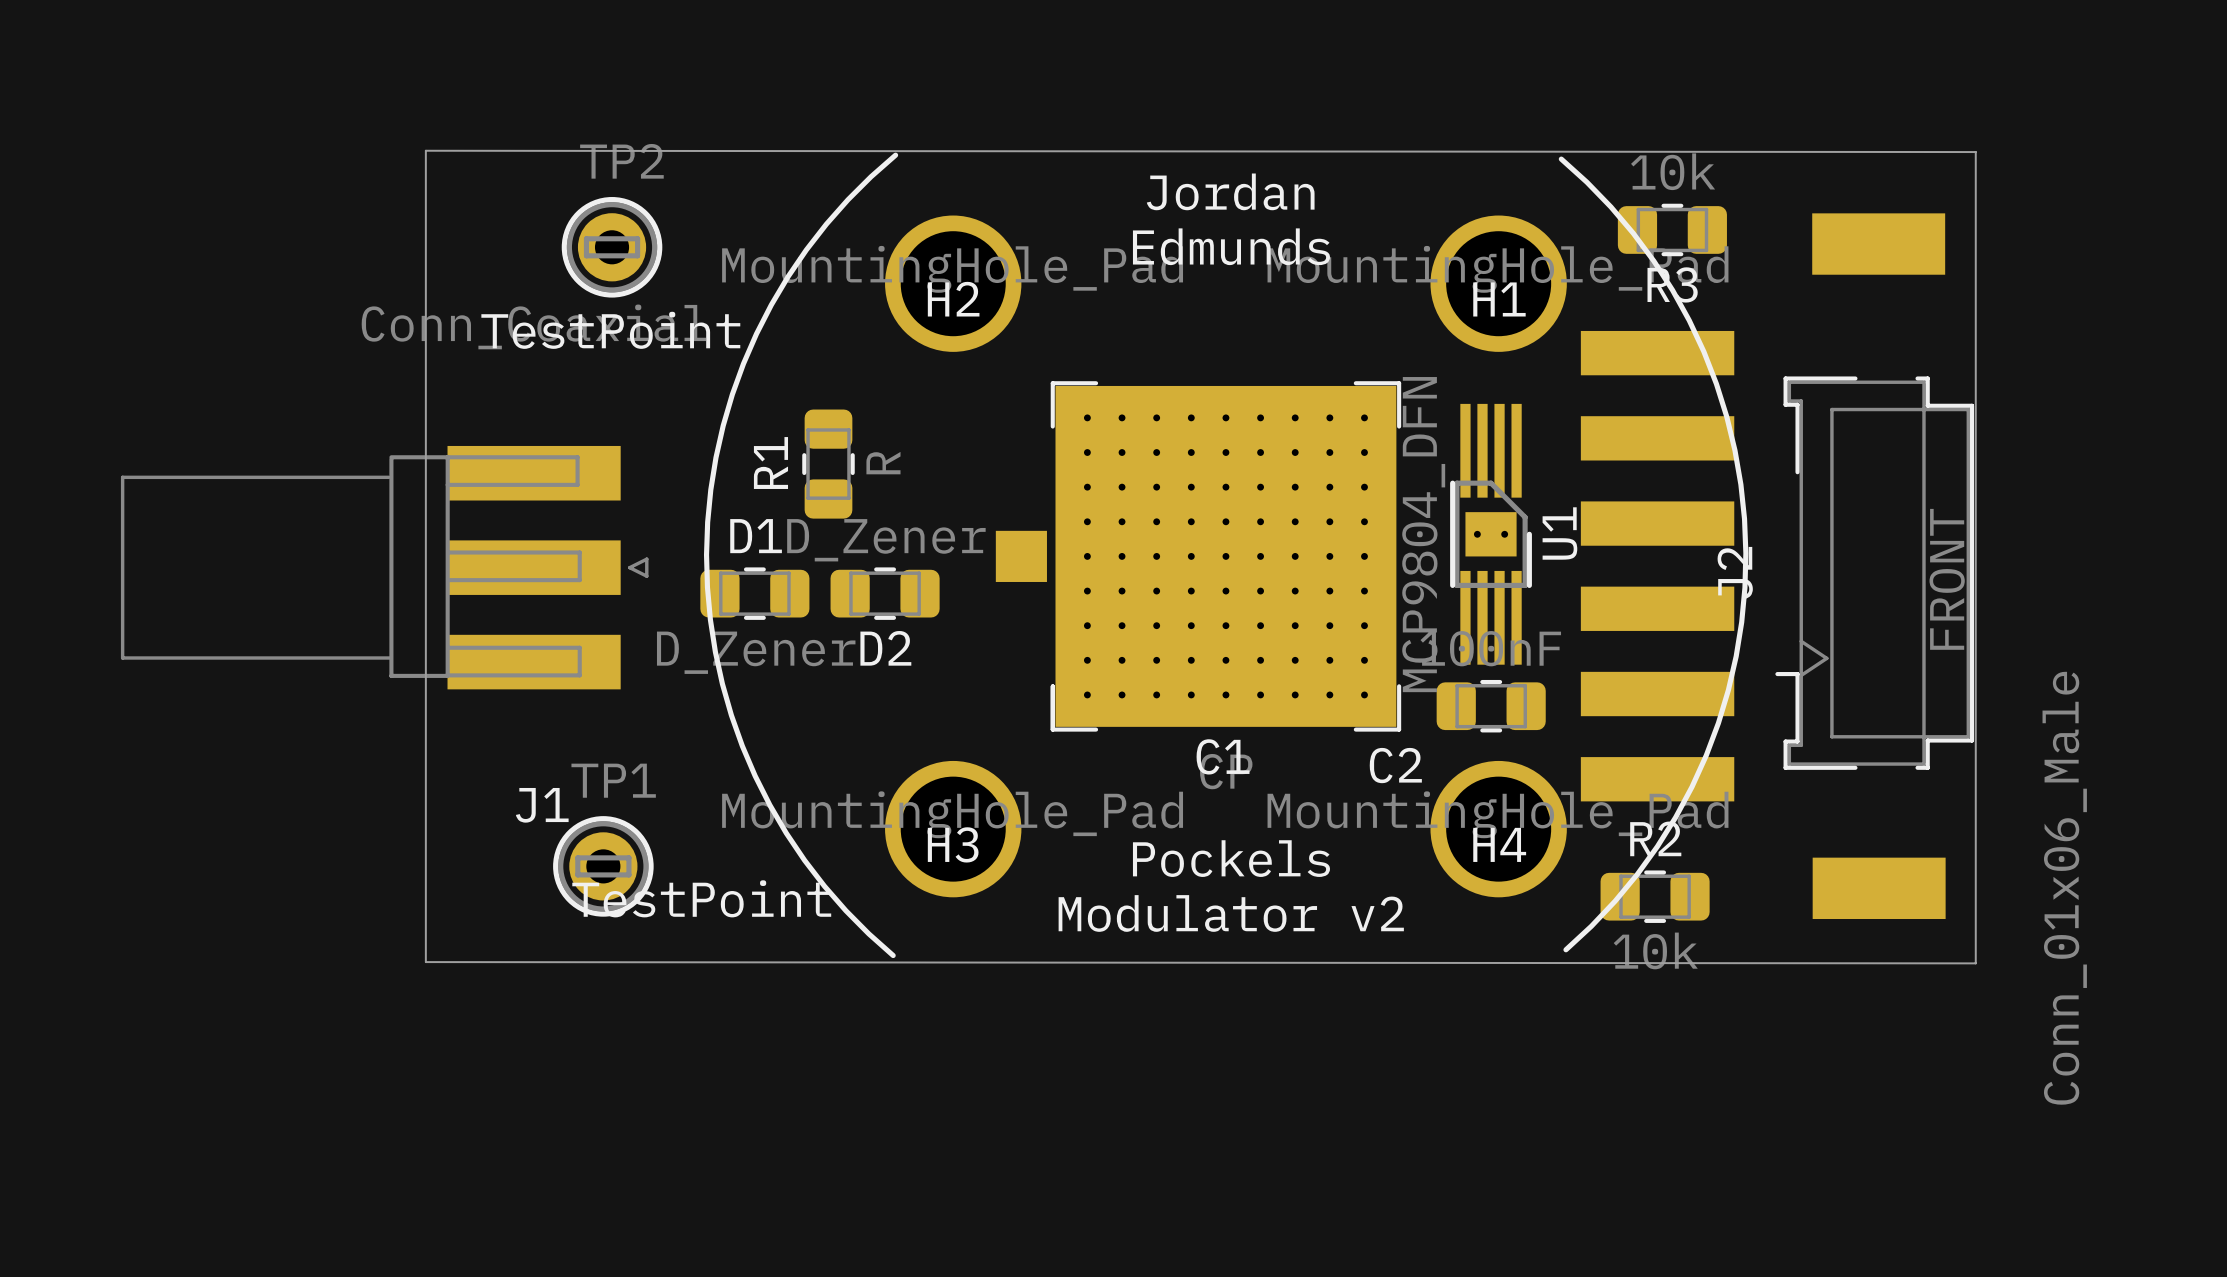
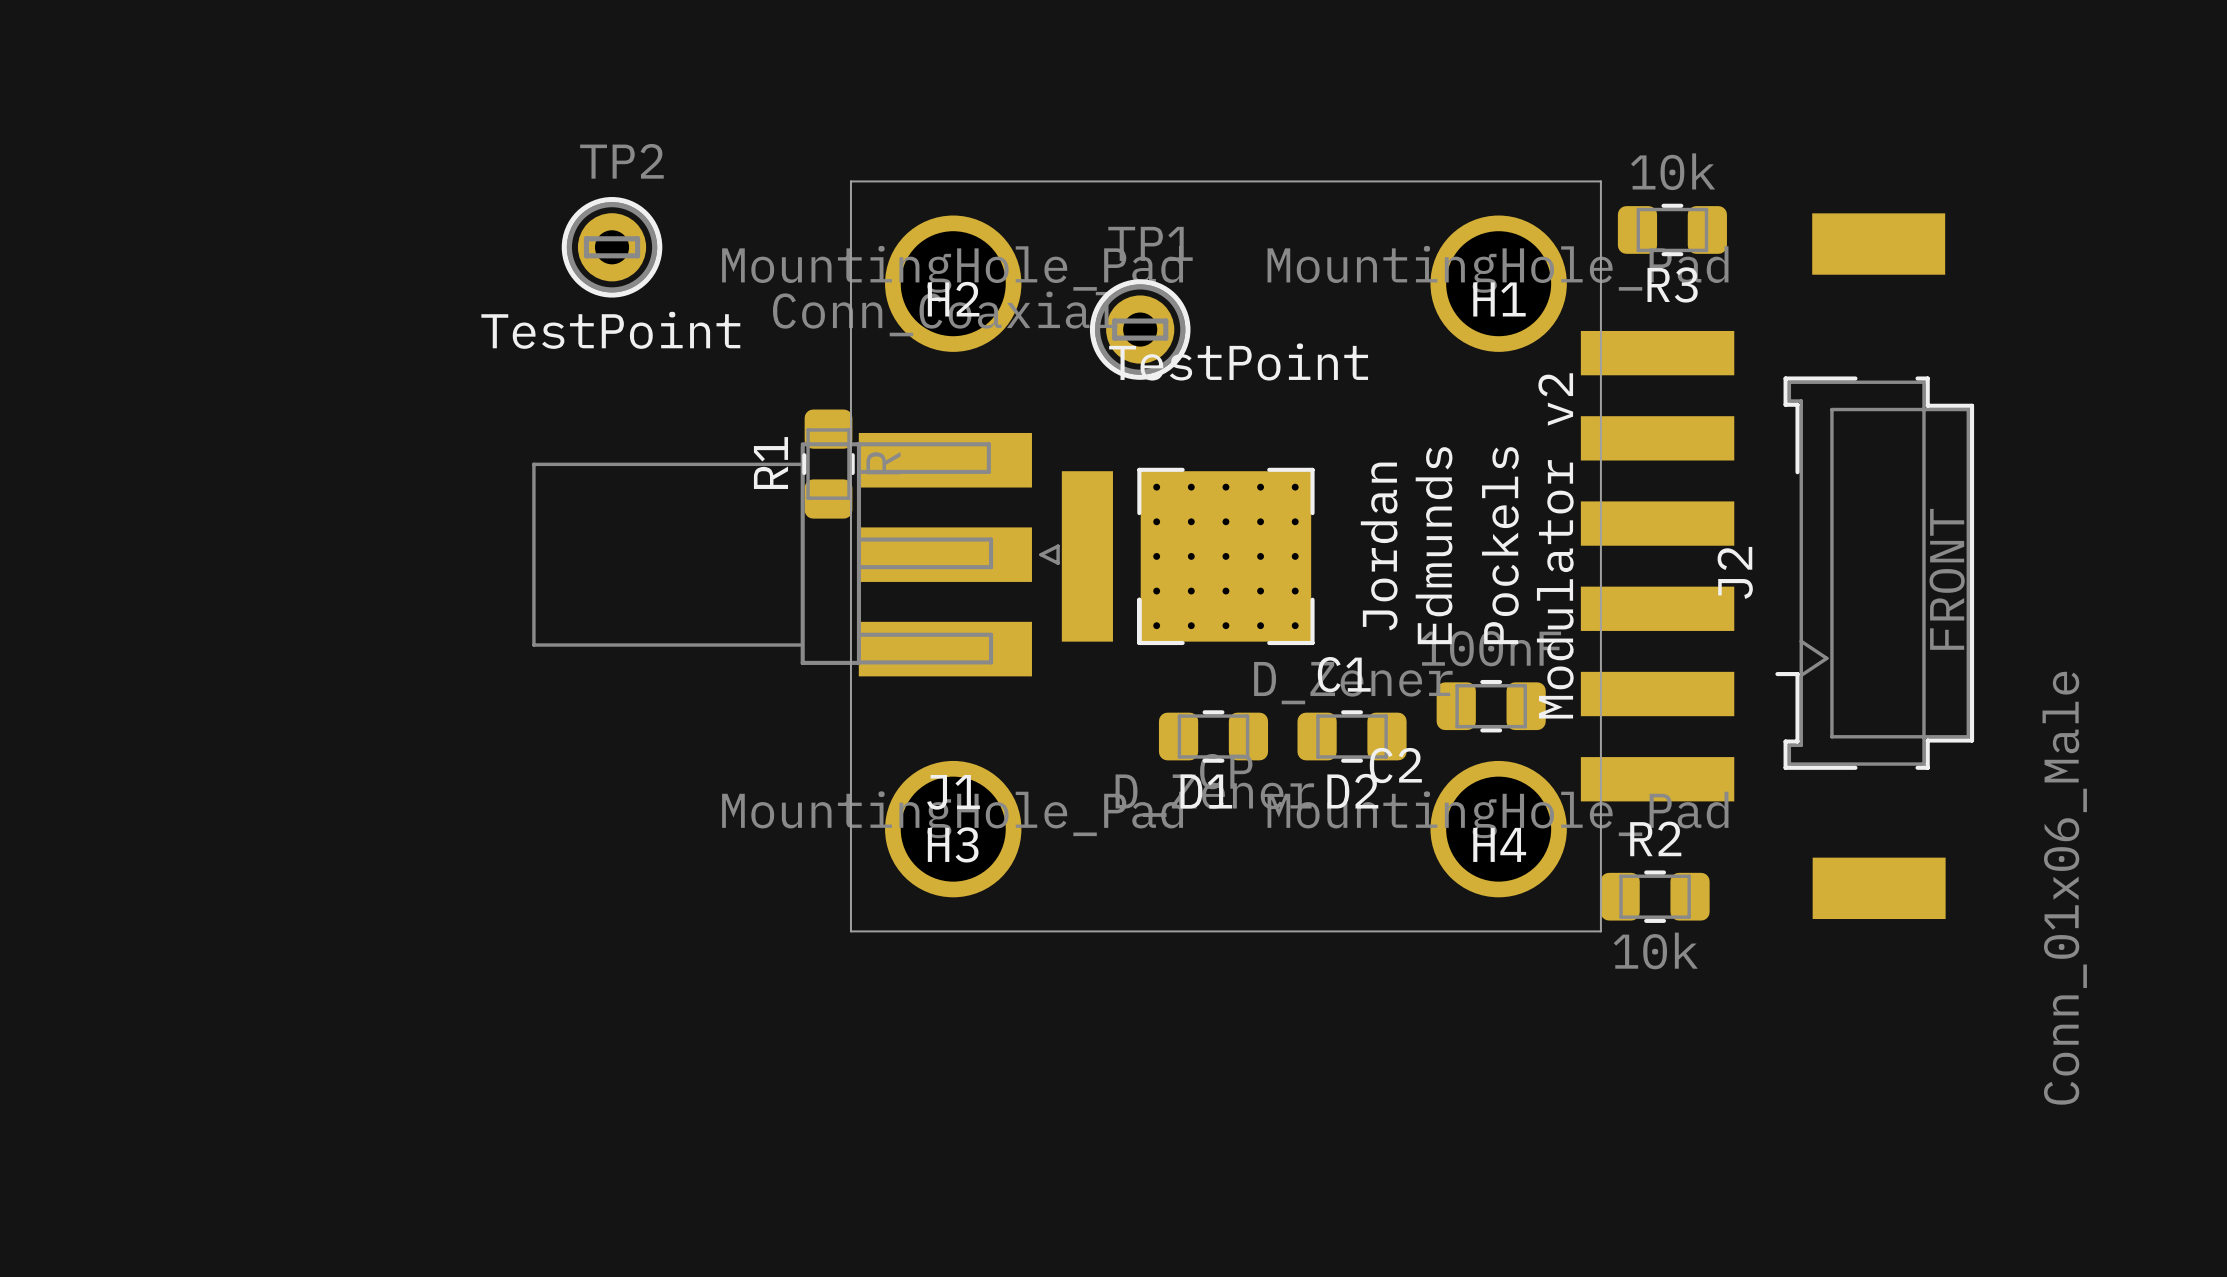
board edge: (425, 150) (1975, 152) (1975, 963) (425, 962) (425, 150) -> none
line: (895, 155) (848, 199) (826, 224) (788, 276) (756, 333) (743, 363) (723, 425) (710, 489) (706, 554) (710, 619) (722, 683) (731, 715) (755, 775) (769, 805) (804, 860) (845, 910) (893, 955) -> none
line: (1561, 159) (1611, 207) (1633, 233) (1653, 261) (1689, 320) (1703, 351) (1726, 416) (1740, 484) (1745, 553) (1741, 622) (1728, 690) (1718, 723) (1692, 786) (1657, 846) (1637, 874) (1591, 926) (1565, 949) -> none
board edge: none -> (850, 181) (850, 931) (1600, 931) (1600, 181) (850, 181)
text rotation: 0° (1230, 191) -> 90° counterclockwise (1379, 546)
text position: Jordan (1230, 191) -> Jordan (1379, 546)
text rotation: 0° (1231, 246) -> 90° counterclockwise (1434, 545)
text position: Edmunds (1231, 246) -> Edmunds (1434, 545)
C1 footprint: [995, 381, 1402, 732] -> [1061, 467, 1315, 646]
J1 footprint: [120, 445, 649, 690] -> [532, 432, 1060, 677]
U1: MCP9804_DFN (1491, 534) -> none
D1 name position: D1 (756, 536) -> D1 (1206, 791)
D1 position: (754, 593) -> (1213, 736)
D2 position: (885, 593) -> (1352, 736)
C1 name position: C1 (1223, 756) -> C1 (1344, 674)
text rotation: 0° (1231, 858) -> 90° counterclockwise (1500, 545)
text position: Pockels (1231, 858) -> Pockels (1500, 545)
TP1 position: (603, 866) -> (1140, 329)
text rotation: 0° (1231, 913) -> 90° counterclockwise (1555, 545)
text position: Modulator v2 (1231, 913) -> Modulator v2 (1555, 545)

